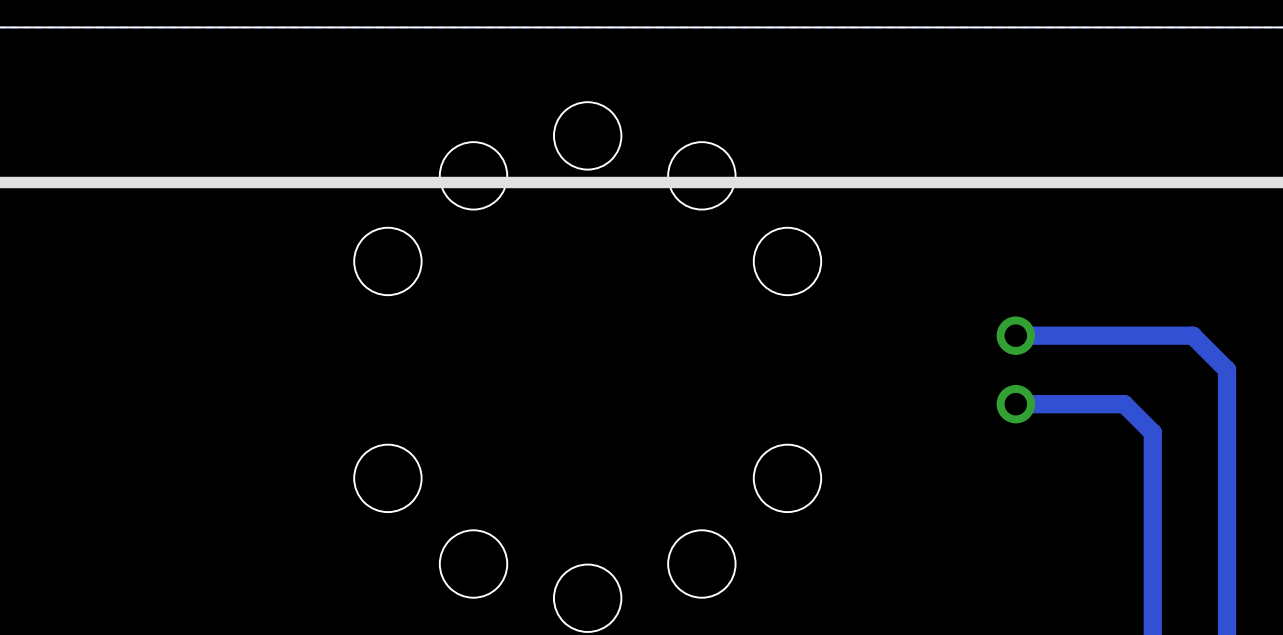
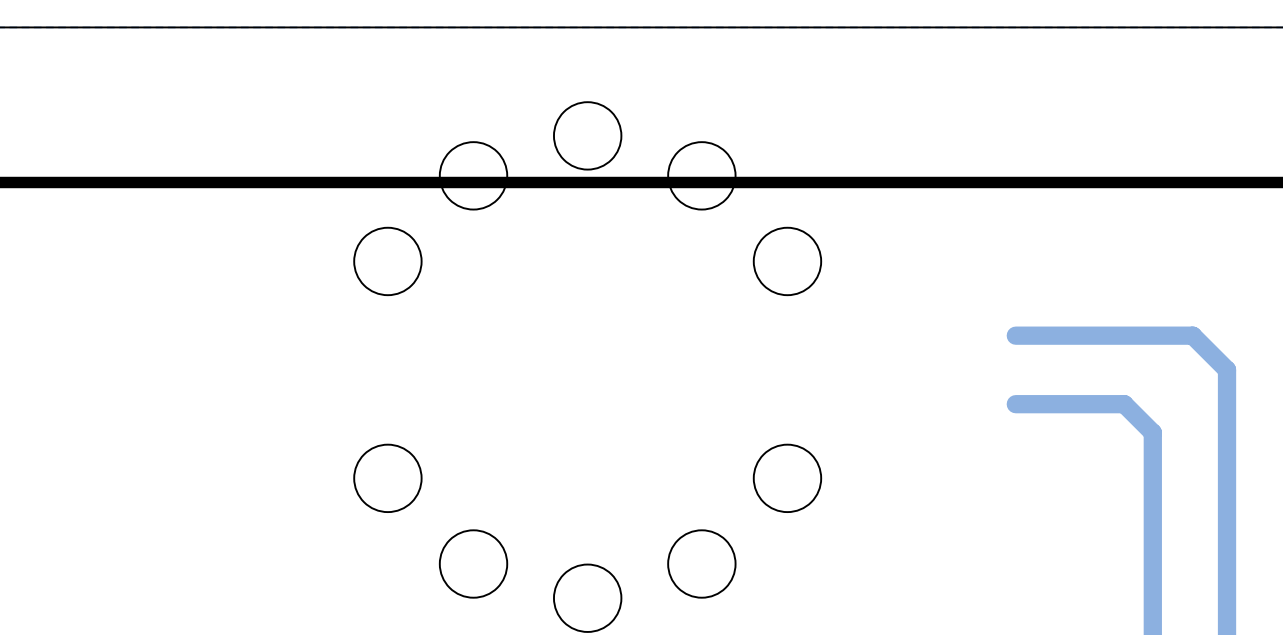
via: (1015, 335) -> none
via: (1015, 404) -> none

